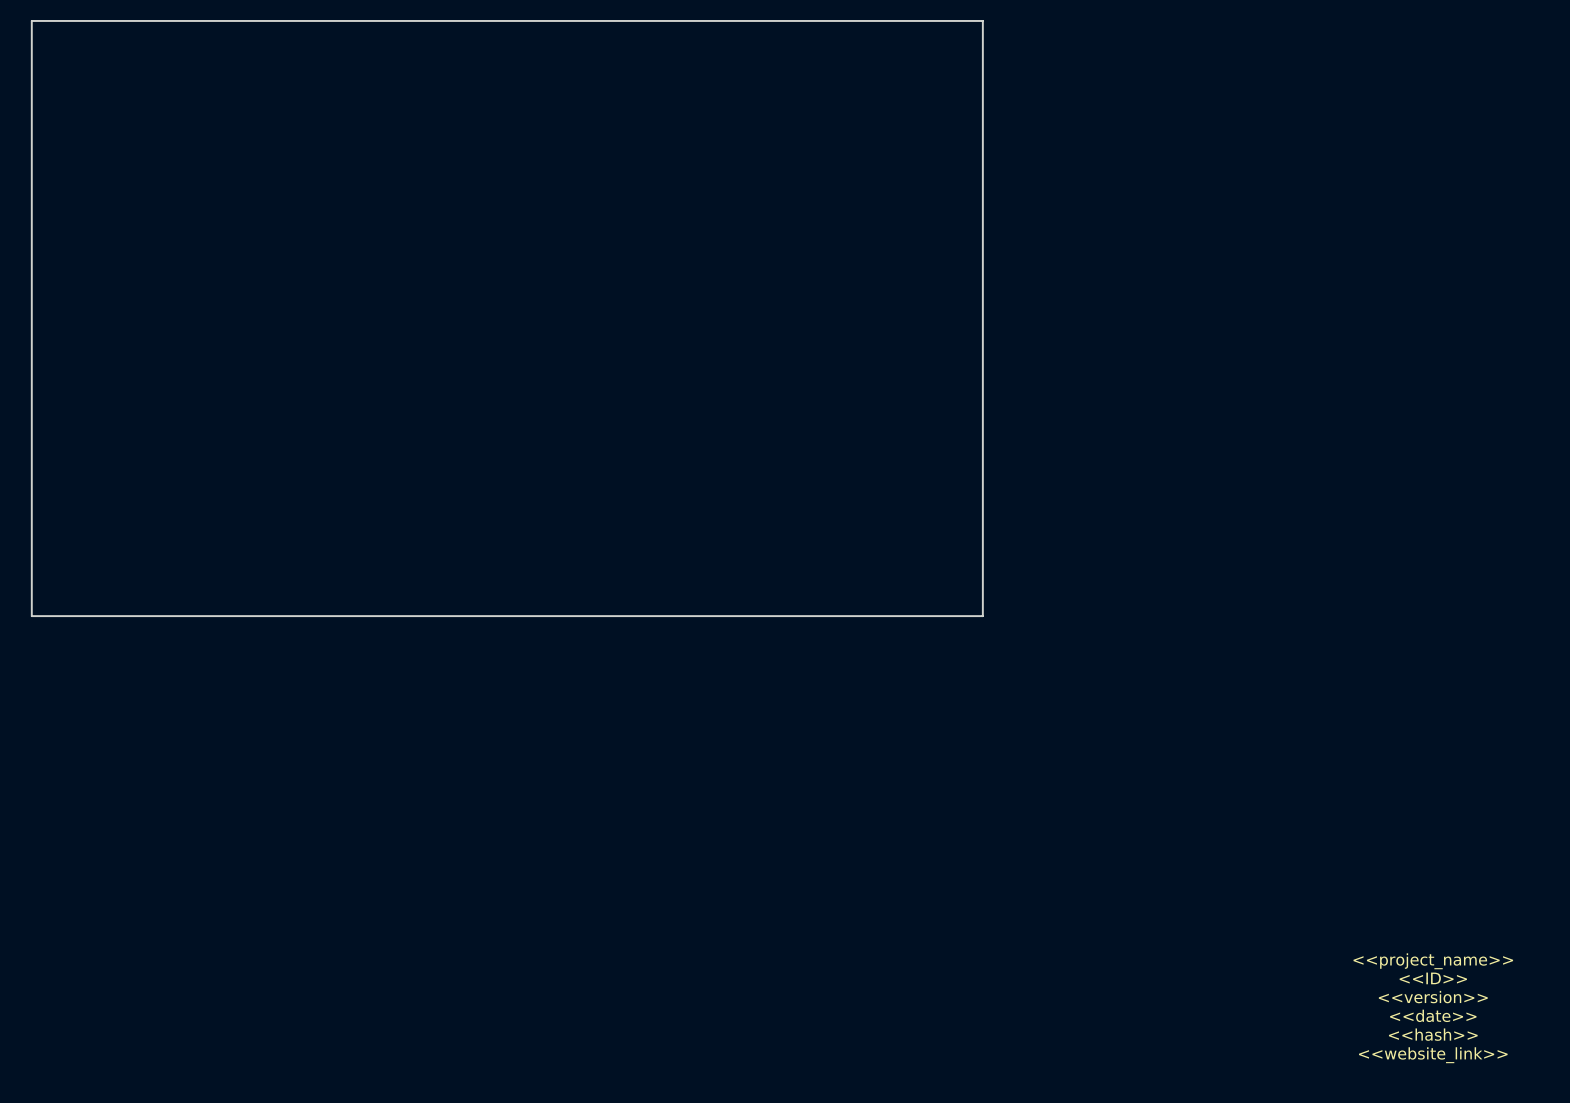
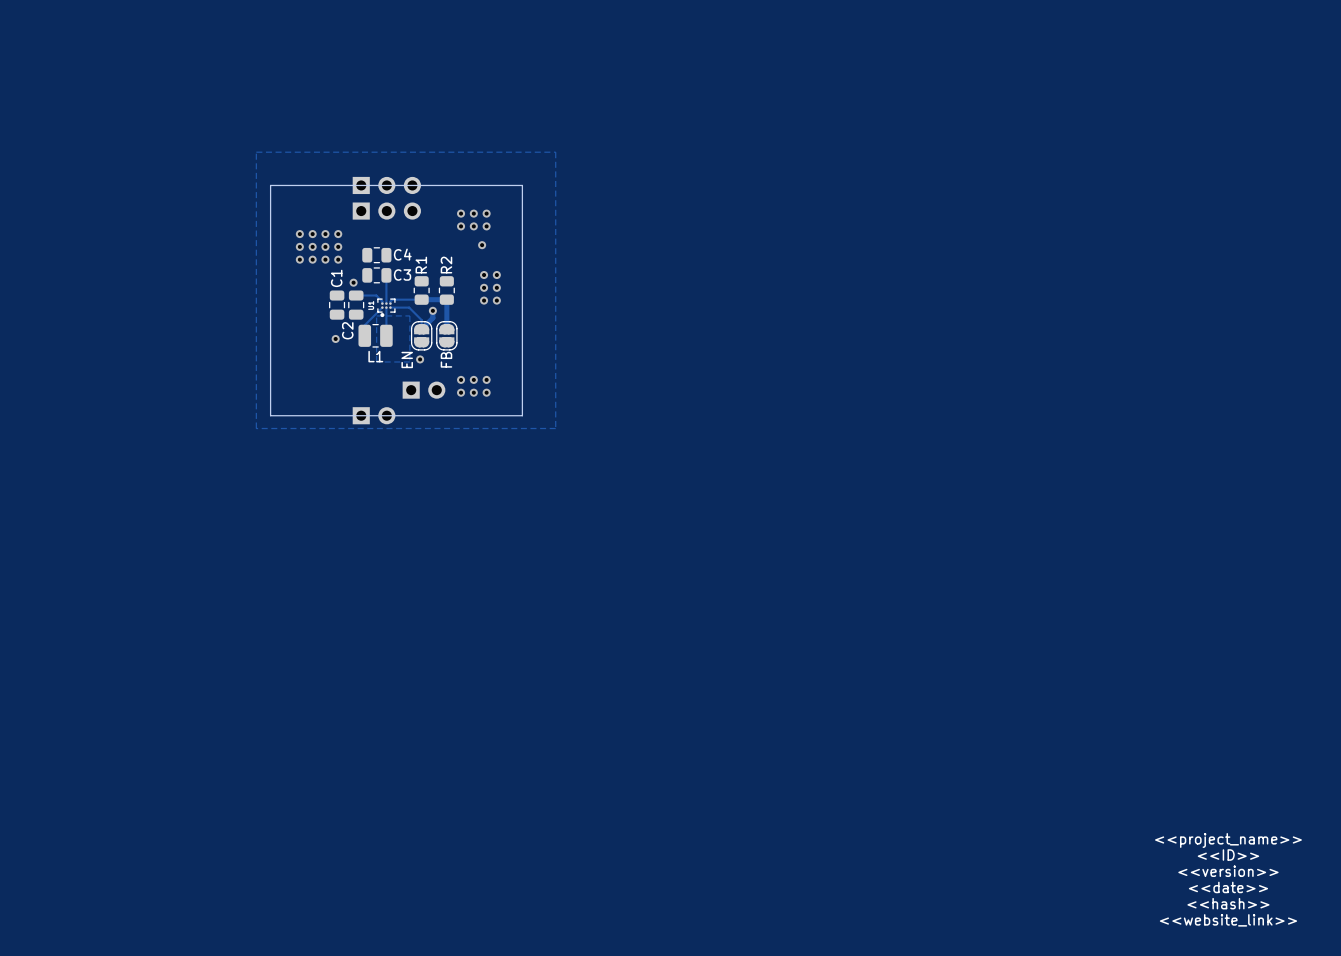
board edge: (31, 20) (982, 20) (982, 616) (31, 616) (31, 20) -> none
zone outline: none -> (256, 152) (256, 428) (555, 428) (555, 152) (256, 152)
board edge: none -> (270, 185) (522, 185) (522, 415) (270, 415) (270, 185)
part: none -> (386, 185)
part: none -> (386, 211)
via: none -> (461, 213)
via: none -> (473, 213)
via: none -> (486, 213)
via: none -> (461, 226)
via: none -> (473, 226)
via: none -> (486, 226)
via: none -> (299, 234)
via: none -> (312, 234)
via: none -> (325, 234)
via: none -> (338, 234)
via: none -> (482, 245)
via: none -> (299, 246)
via: none -> (312, 246)
via: none -> (325, 246)
via: none -> (338, 246)
C4: none -> (376, 255)
via: none -> (299, 259)
via: none -> (312, 259)
via: none -> (325, 259)
via: none -> (338, 259)
C3: none -> (376, 275)
track: none -> (386, 275) (386, 303)
via: none -> (484, 275)
via: none -> (496, 275)
via: none -> (353, 282)
via: none -> (484, 287)
via: none -> (496, 287)
R1: none -> (421, 290)
R2: none -> (446, 290)
track: none -> (356, 295) (376, 295) (382, 303)
via: none -> (484, 300)
via: none -> (496, 300)
track: none -> (390, 303) (392, 299) (446, 299) (446, 329)
C1: none -> (337, 305)
C2: none -> (356, 305)
track: none -> (382, 307) (364, 325) (364, 335)
track: none -> (386, 307) (386, 335)
part: none -> (386, 307)
track: none -> (390, 307) (409, 307) (421, 320) (421, 329)
track: none -> (432, 310) (432, 318) (421, 329)
via: none -> (432, 310)
zone outline: none -> (376, 315) (376, 361) (409, 361) (409, 315) (376, 315)
L1: none -> (375, 335)
part: none -> (421, 335)
part: none -> (446, 335)
via: none -> (335, 338)
via: none -> (420, 359)
via: none -> (461, 379)
via: none -> (473, 379)
via: none -> (486, 379)
part: none -> (423, 390)
via: none -> (461, 392)
via: none -> (473, 392)
via: none -> (486, 392)
part: none -> (374, 415)

